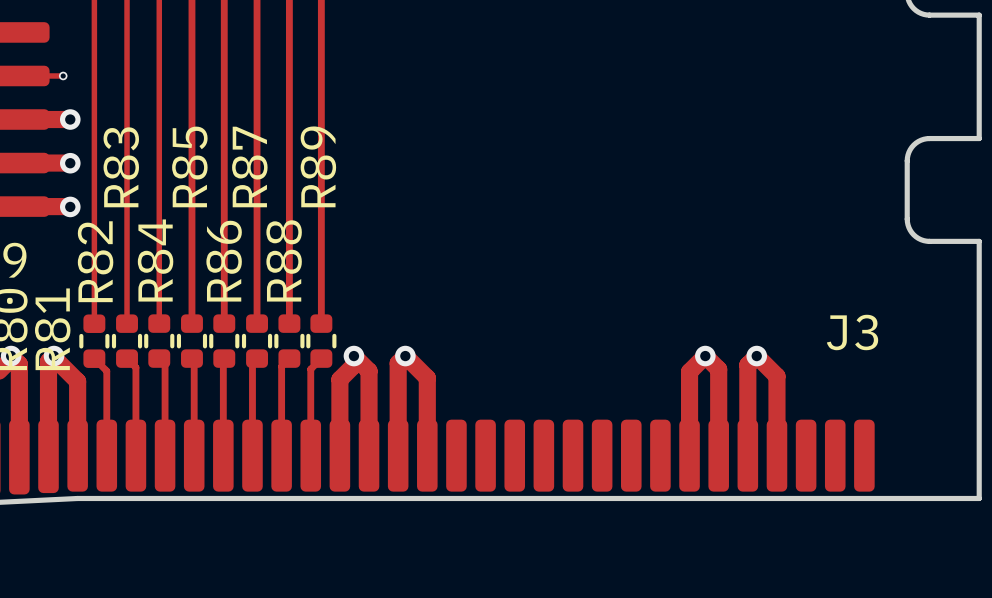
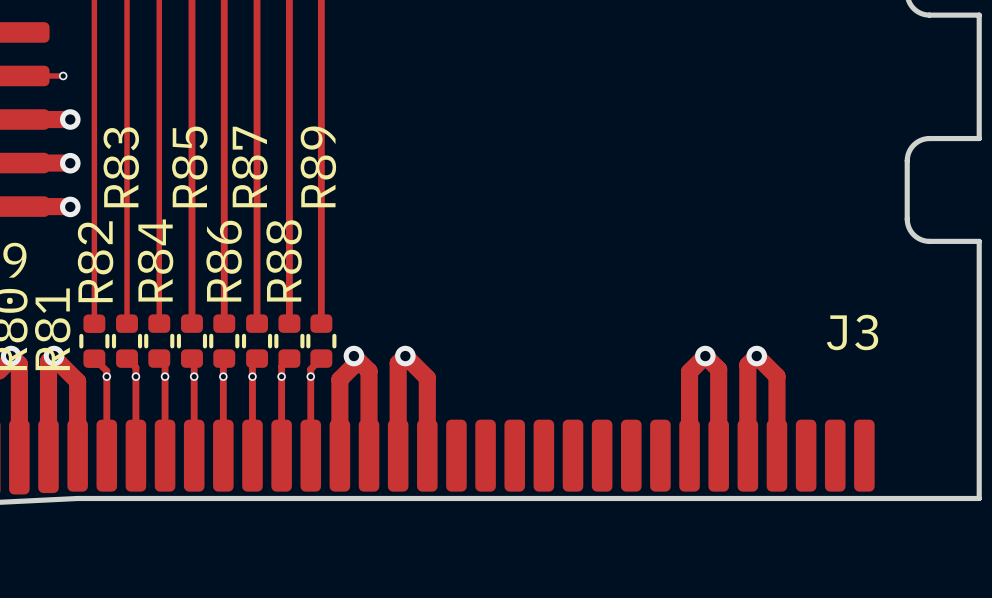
via: none -> (106, 376)
via: none -> (135, 376)
via: none -> (165, 376)
via: none -> (194, 376)
via: none -> (223, 376)
via: none -> (252, 376)
via: none -> (281, 376)
via: none -> (310, 376)

